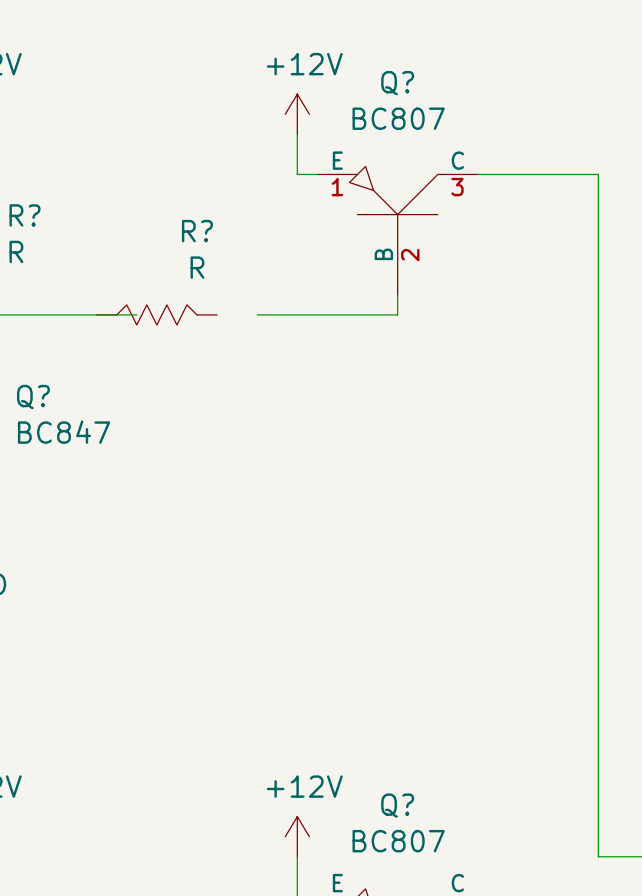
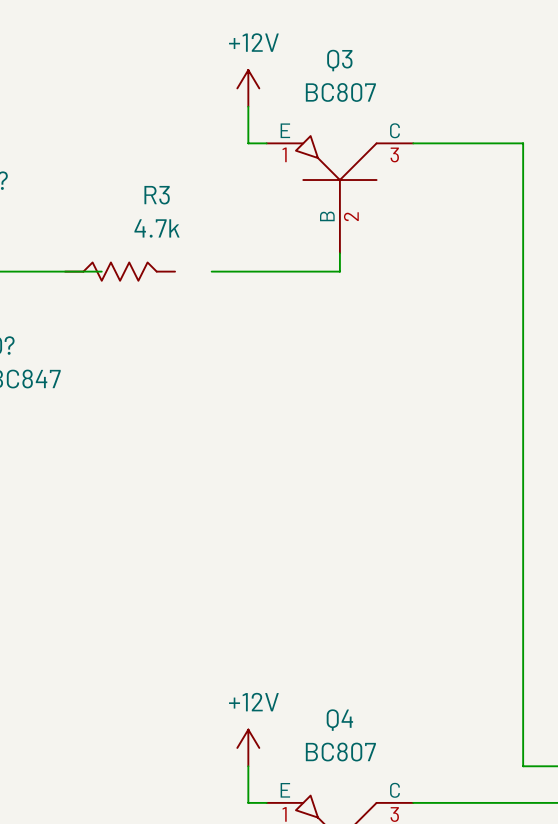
Q? name: Q? (397, 83) -> Q3 (339, 60)
R? name: R? (197, 231) -> R3 (157, 195)
R? value: R (197, 267) -> 4.7k (156, 228)
Q? name: Q? (397, 805) -> Q4 (339, 720)

